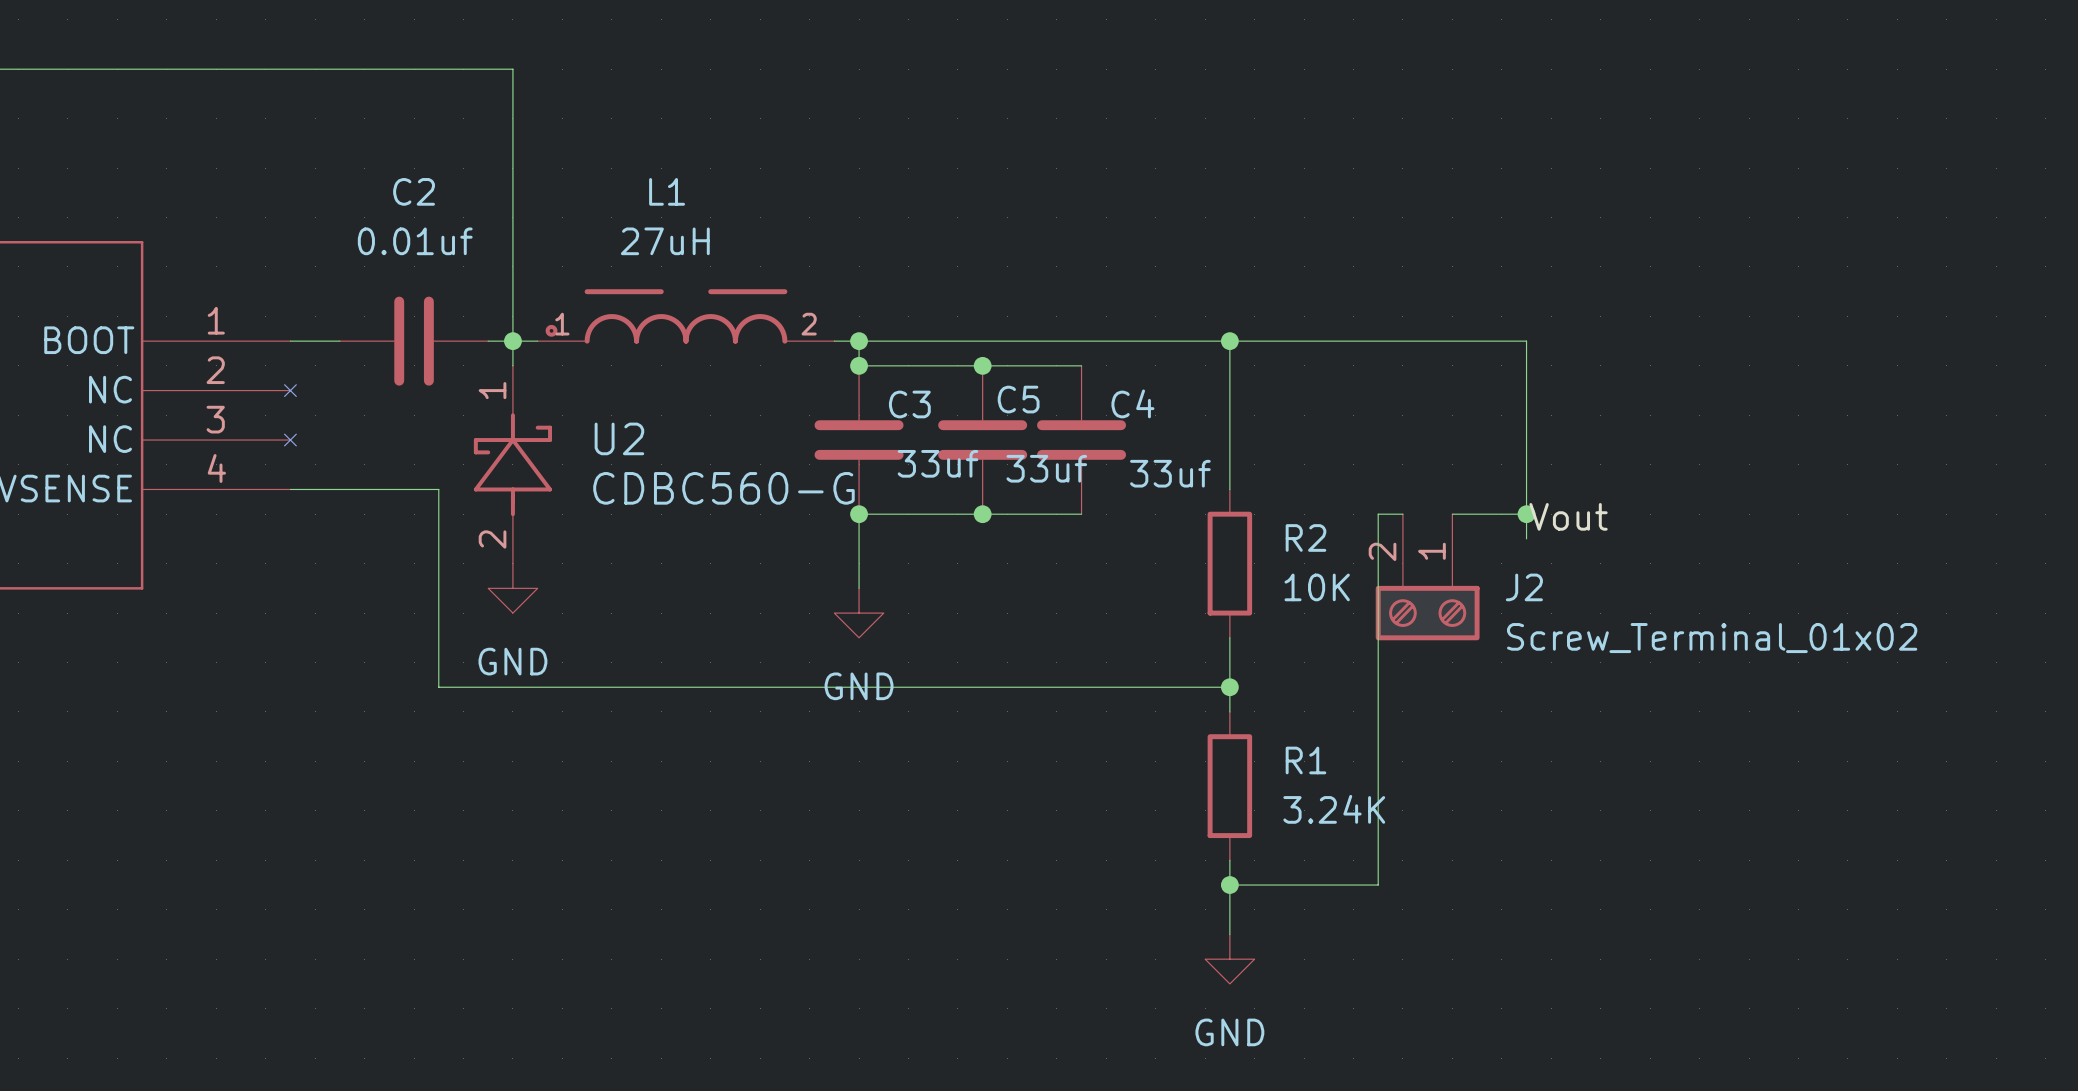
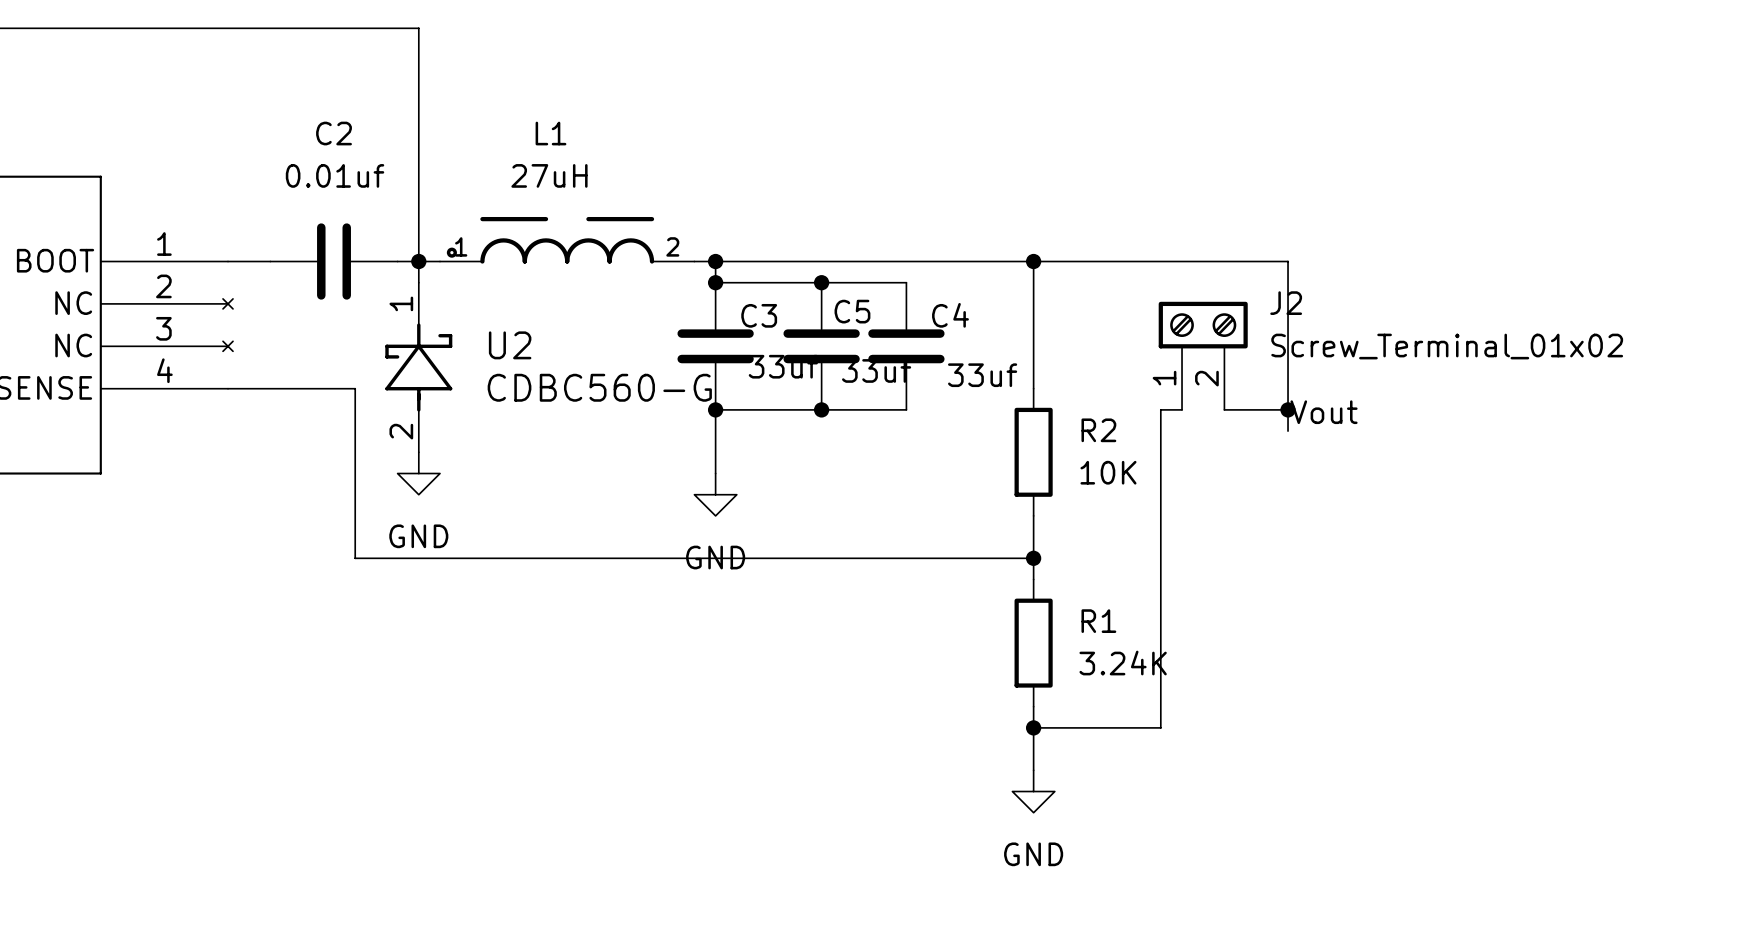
J2 position: (1427, 577) -> (1203, 355)
J2 name position: J2 (1524, 587) -> J2 (1286, 303)
J2 rotation: 0° (1427, 613) -> 180° (1203, 325)
J2 value position: Screw_Terminal_01x02 (1712, 638) -> Screw_Terminal_01x02 (1447, 346)

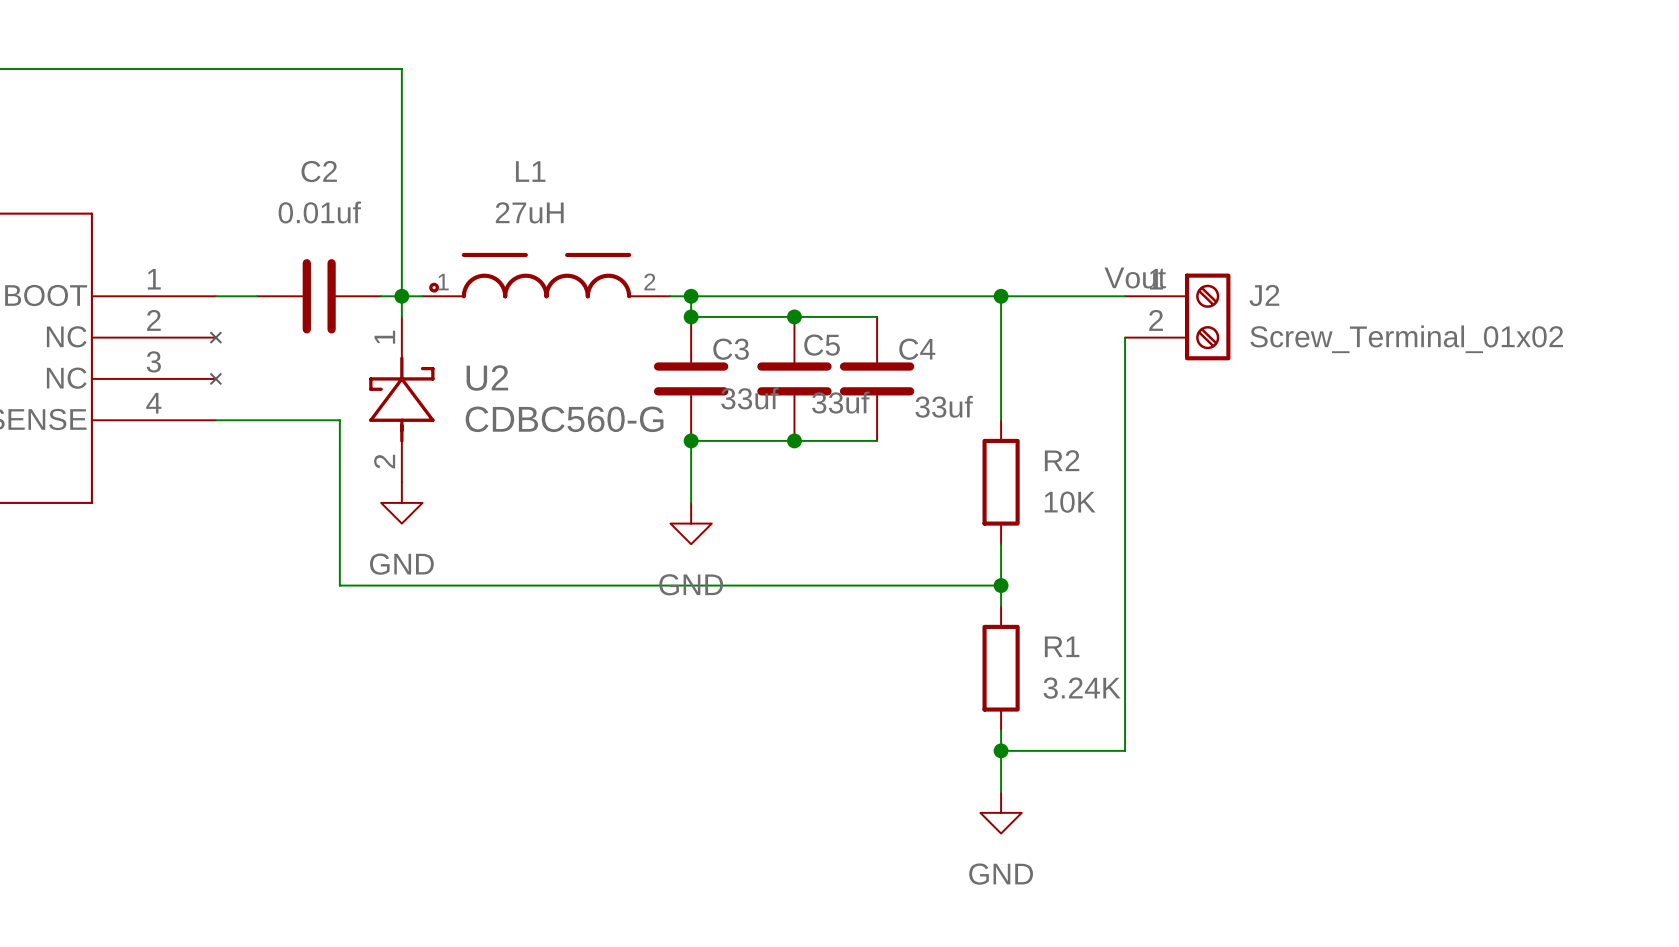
wire: (1160, 261) (1288, 261) (1288, 431) -> none
J2 rotation: 0° (1203, 325) -> 90° clockwise (1207, 316)
J2 position: (1203, 355) -> (1177, 316)
wire: (1160, 409) (1182, 409) -> (1125, 440) (1125, 337)
wire: (1224, 409) (1288, 409) -> none
junction: (1288, 409) -> none
label position: Vout (1324, 412) -> Vout (1135, 277)

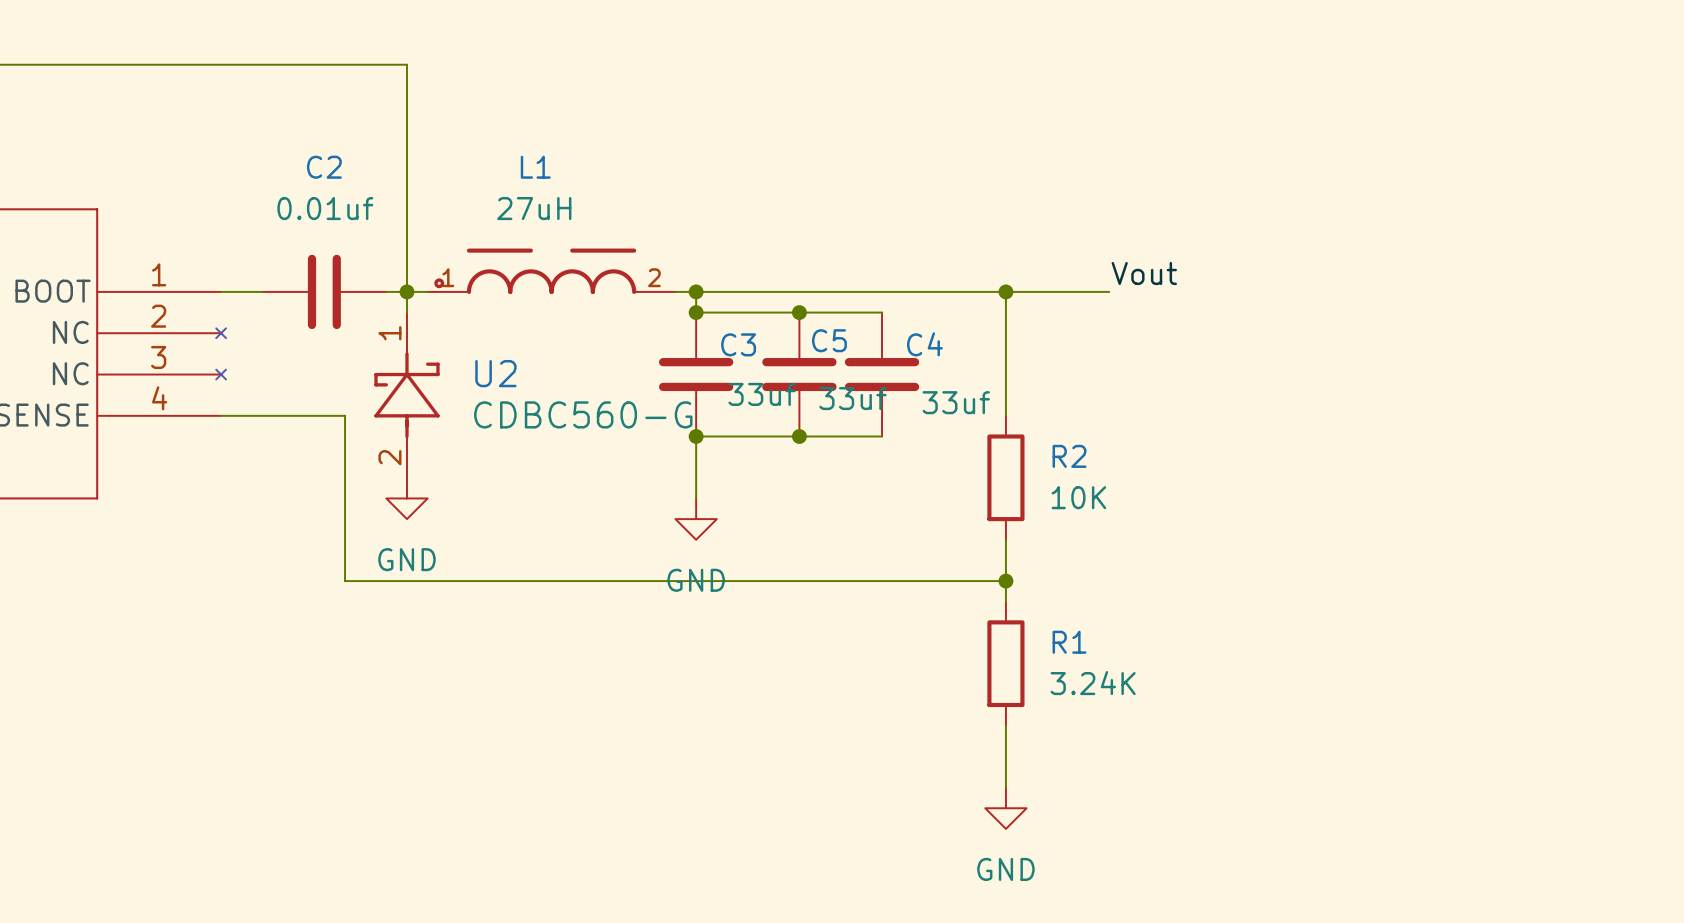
wire: (1104, 296) (1125, 296) -> none
J2: Screw_Terminal_01x02 (1177, 316) -> none
wire: (1125, 337) (1125, 750) (1001, 750) -> none
junction: (1001, 750) -> none

